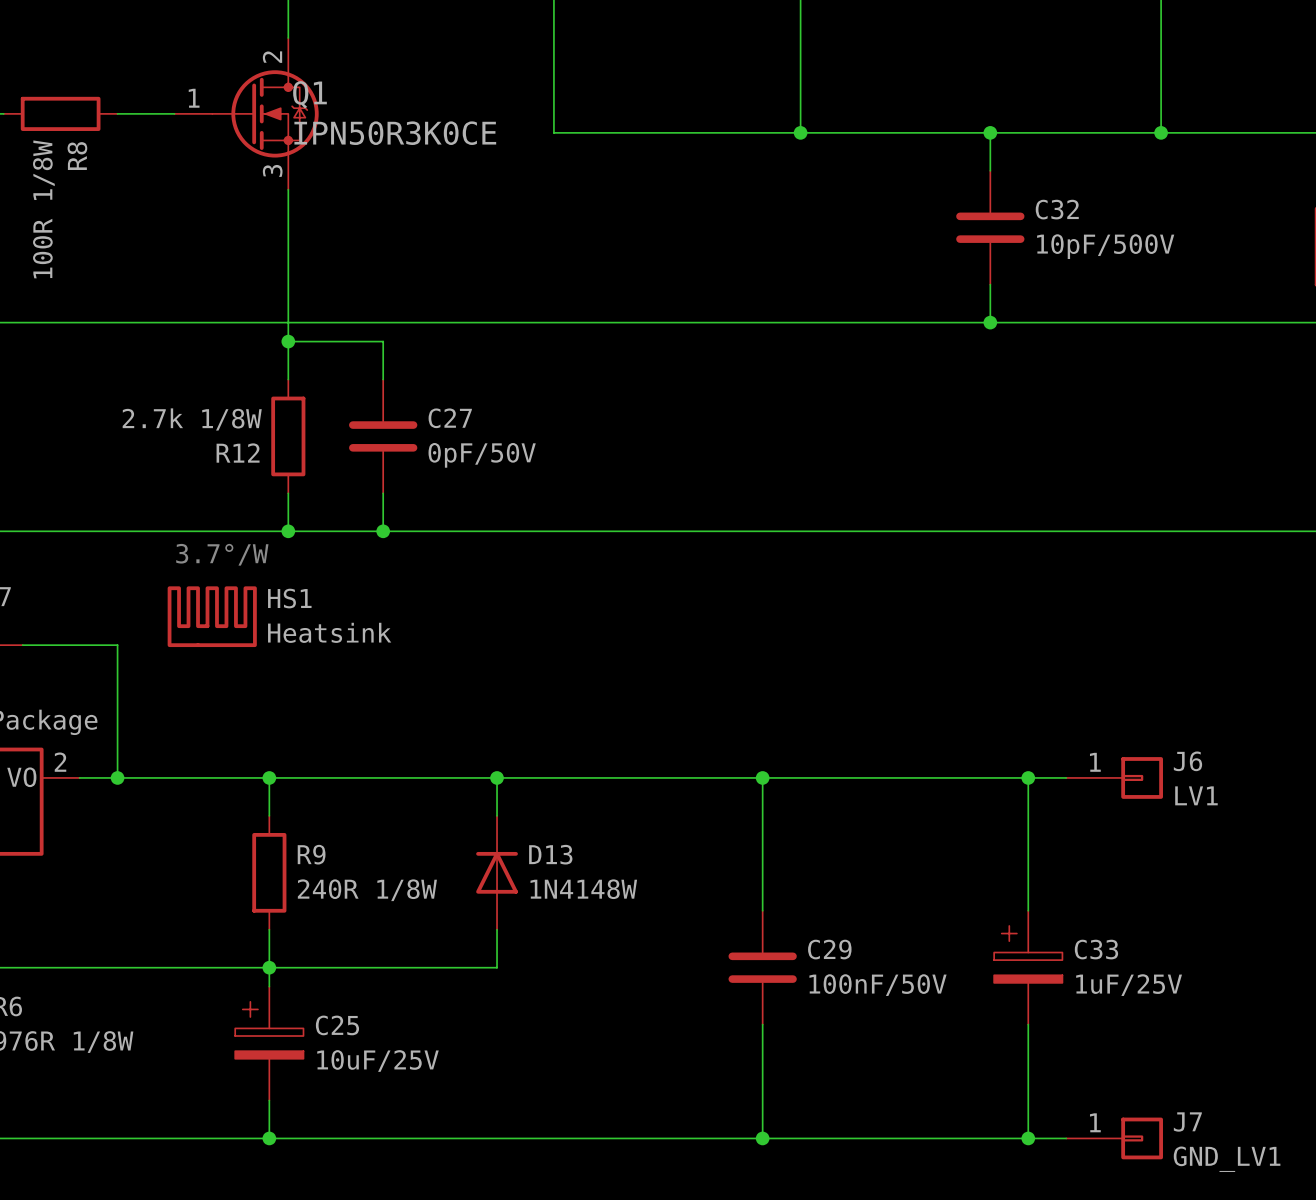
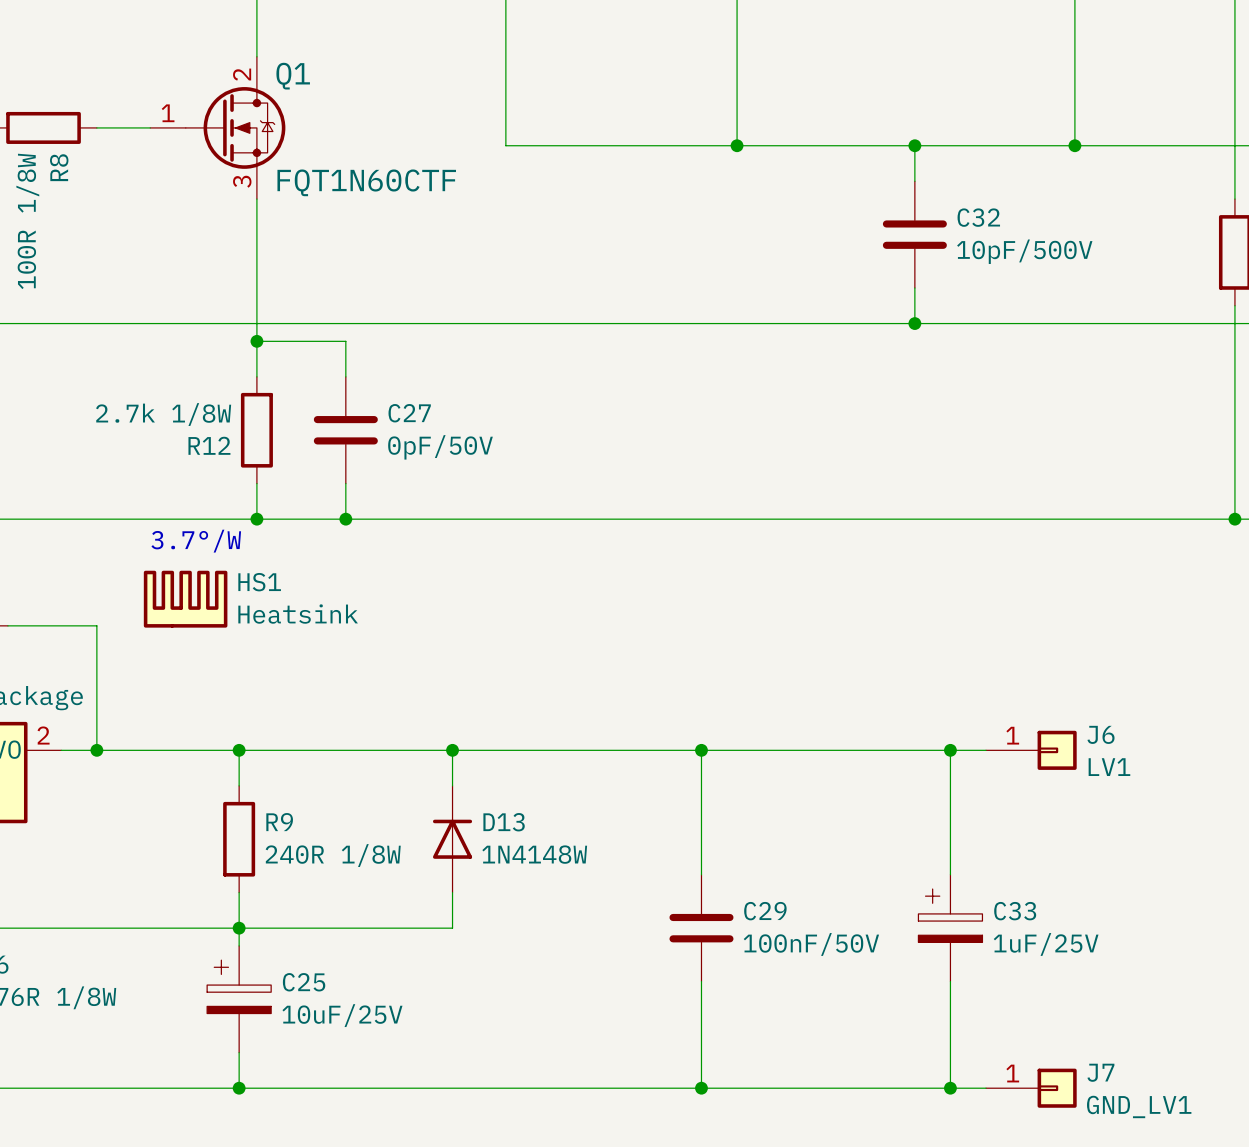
Q1 name position: Q1 (309, 94) -> Q1 (293, 76)
Q1 value: IPN50R3K0CE (395, 133) -> FQT1N60CTF (366, 182)

